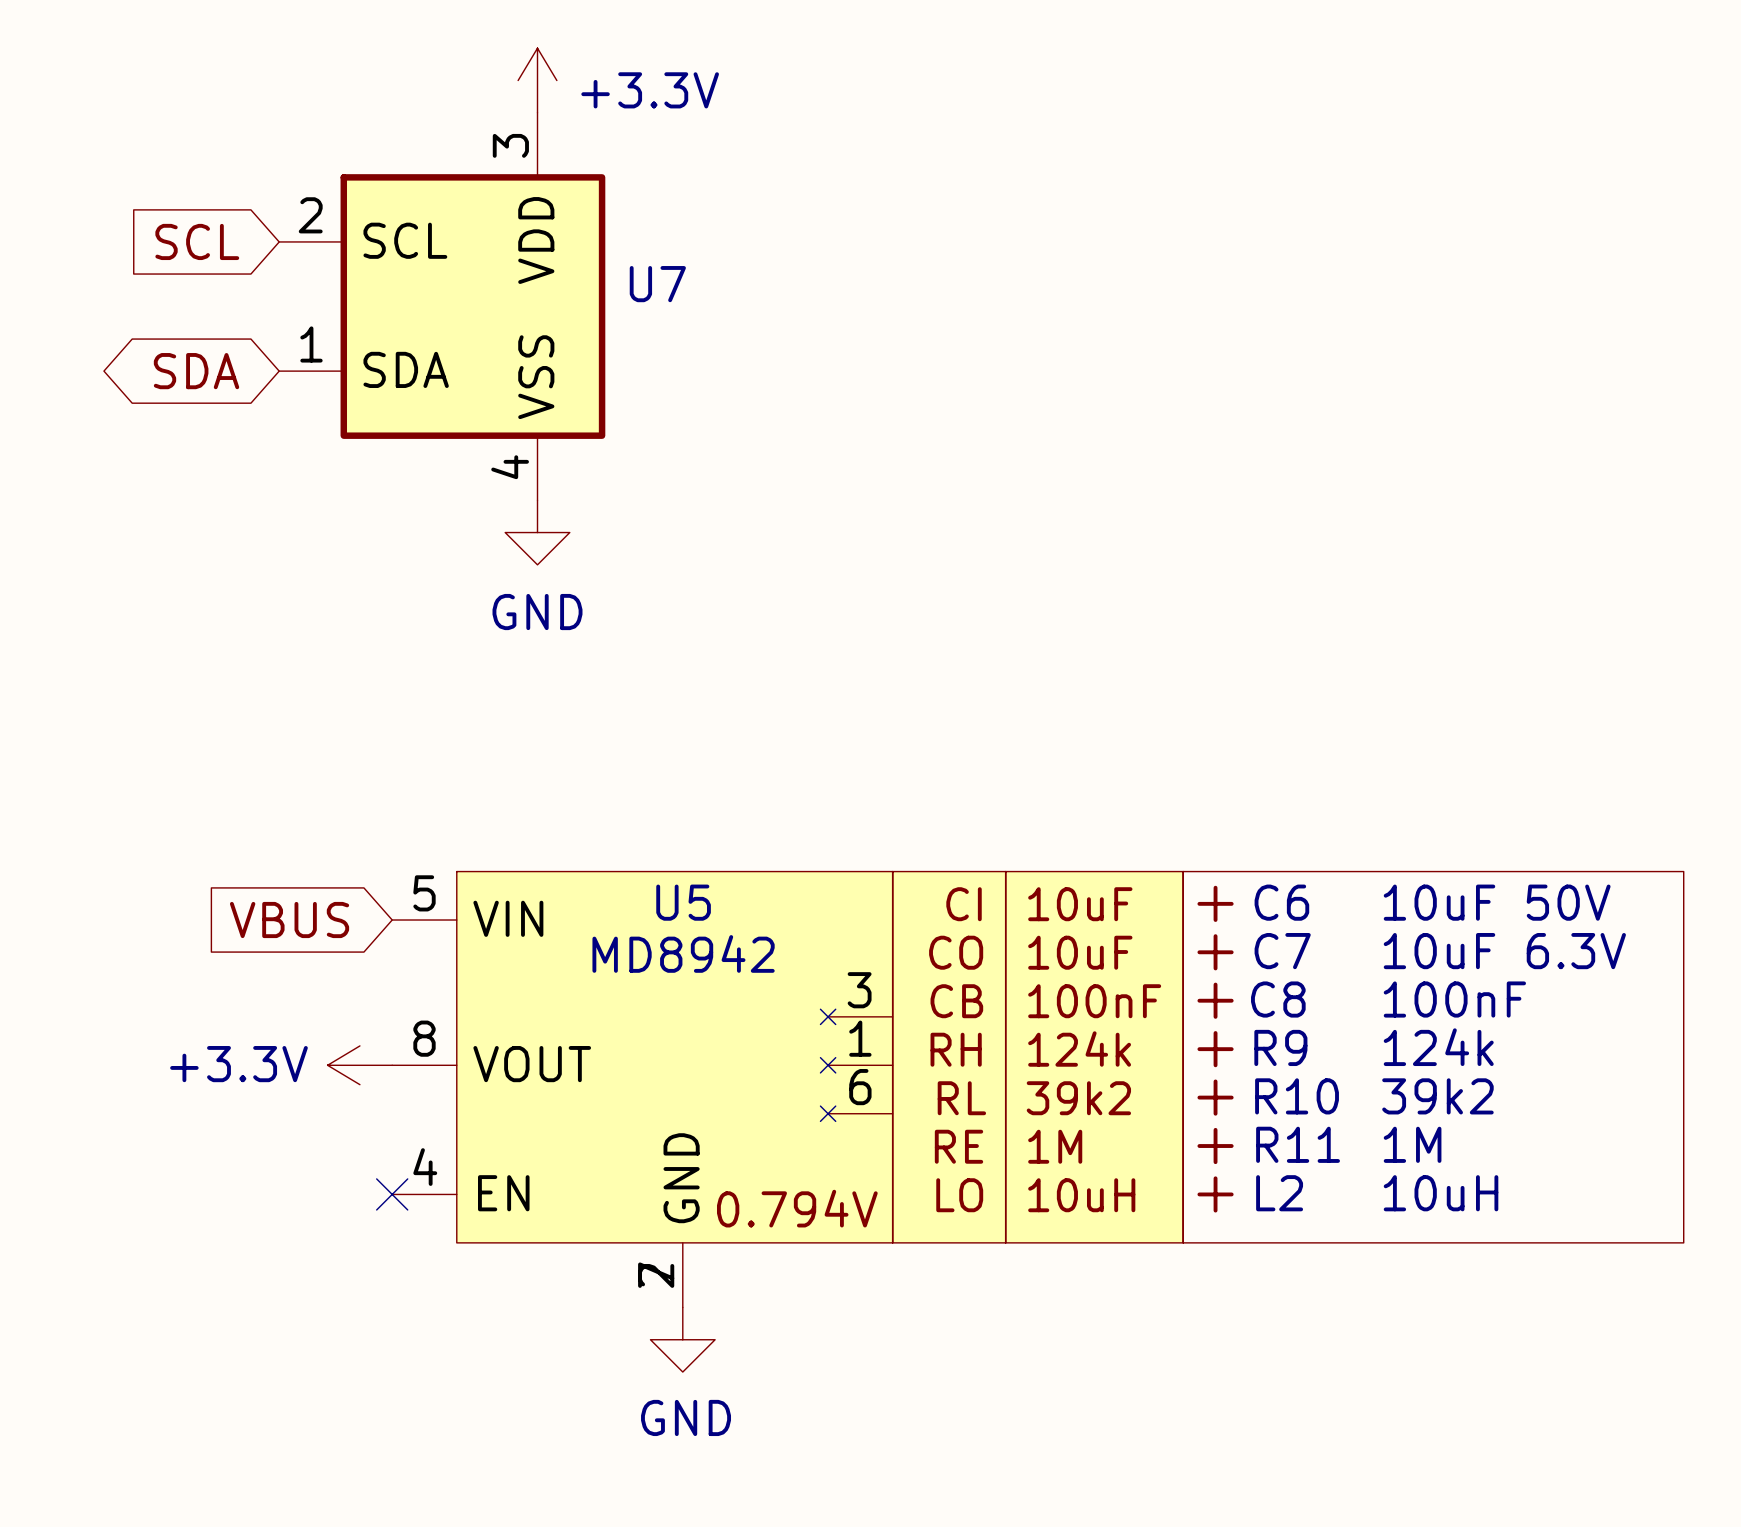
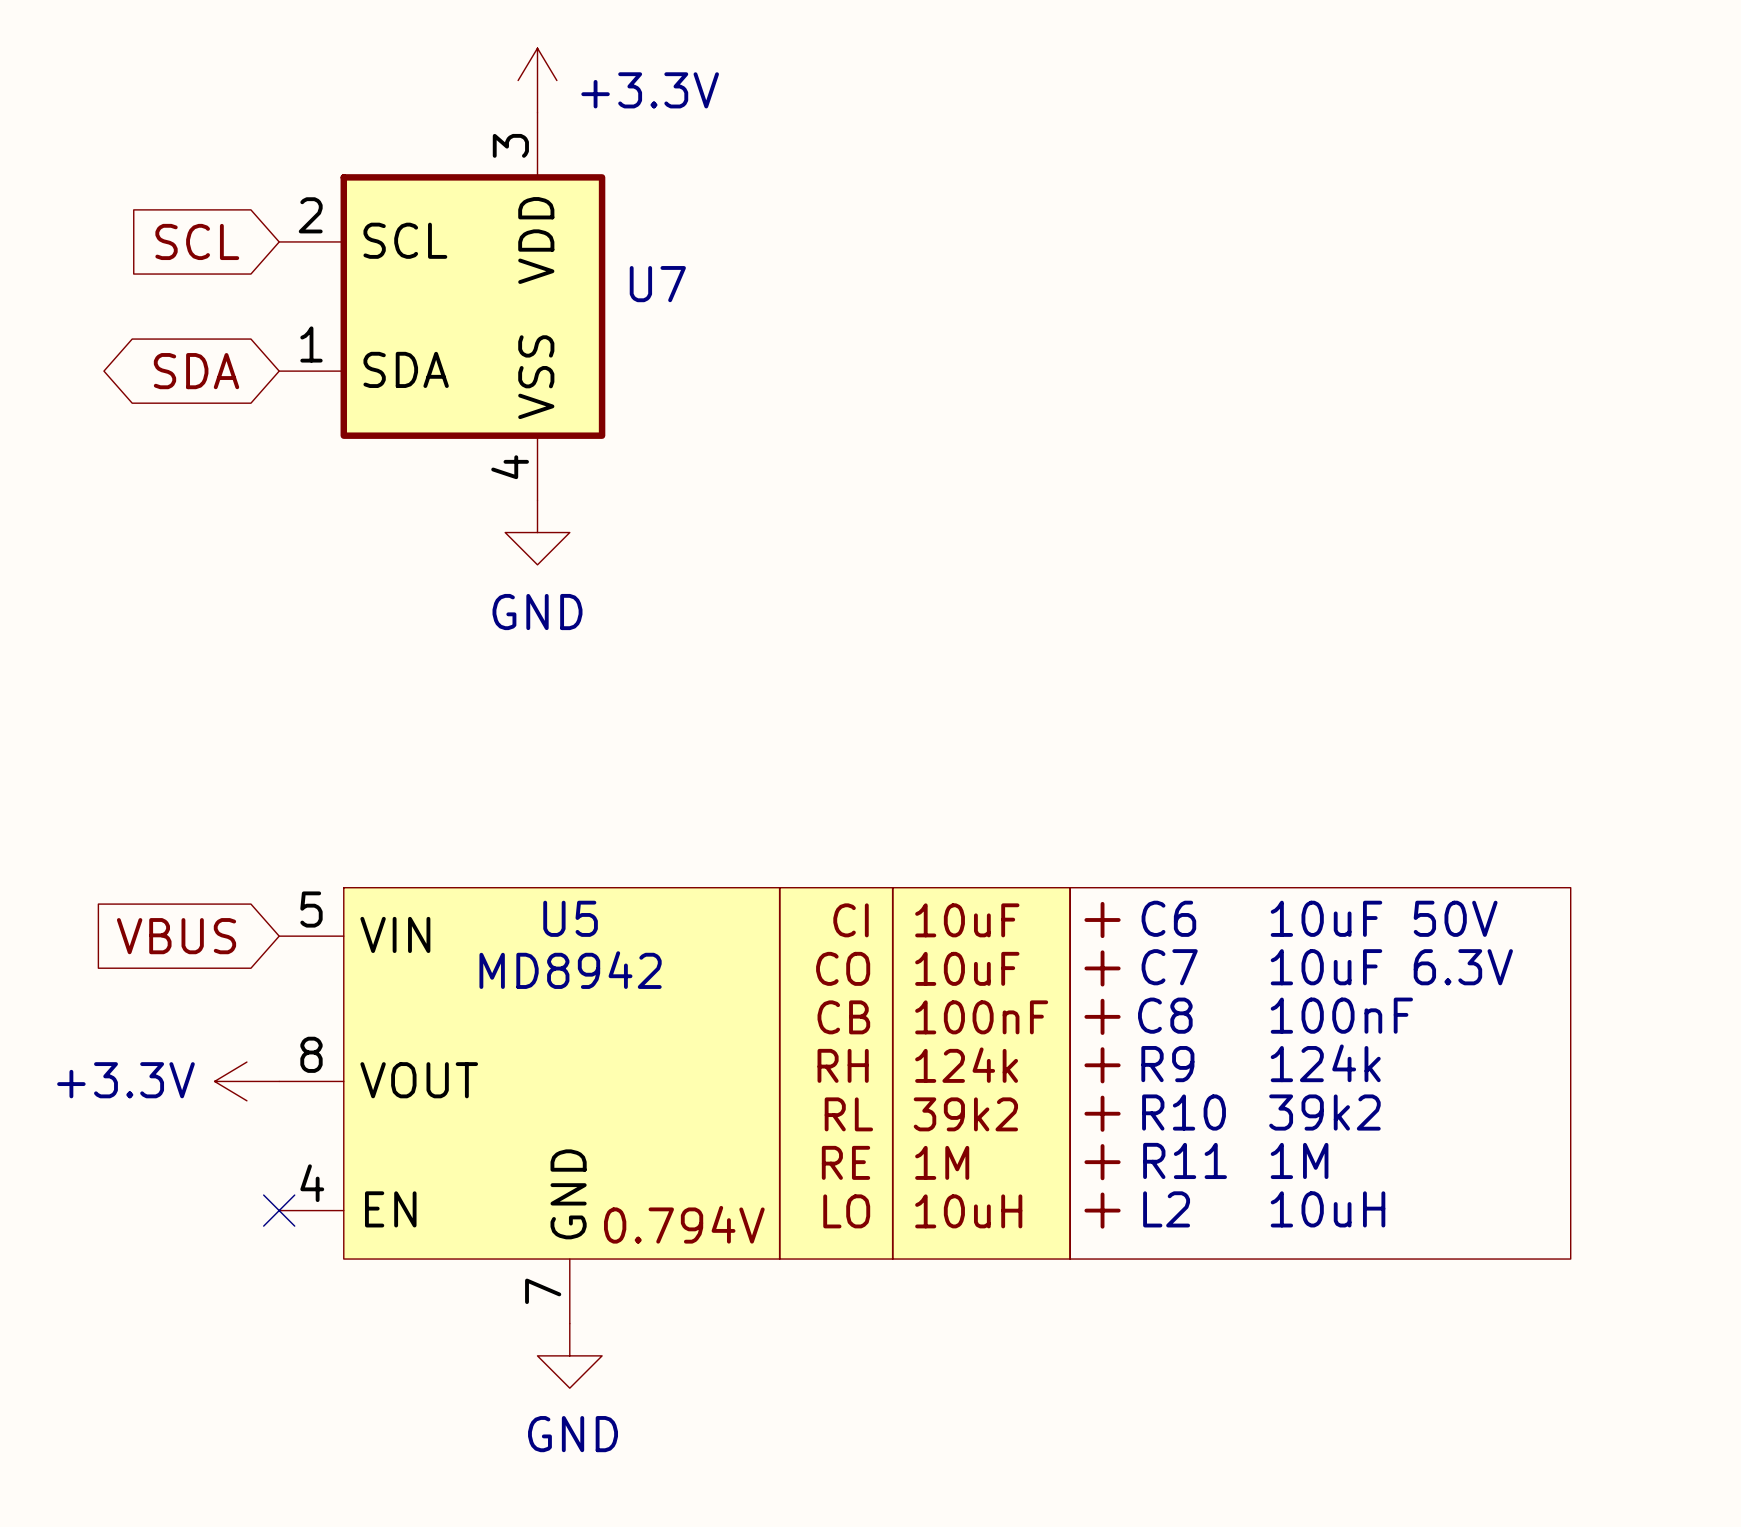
U5 symbol: [392, 871, 1684, 1308] -> [279, 887, 1571, 1324]
C6 position: (1215, 903) -> (1102, 920)
global label position: VBUS (289, 920) -> VBUS (176, 936)
C7 position: (1215, 952) -> (1102, 968)
C8 position: (1215, 1000) -> (1102, 1016)
R9 position: (1215, 1049) -> (1102, 1065)
power symbol position: +3.3V (359, 1065) -> +3.3V (246, 1081)
R10 position: (1215, 1097) -> (1102, 1113)
R11 position: (1215, 1146) -> (1102, 1162)
no-connect mark position: (392, 1194) -> (279, 1210)
L2 position: (1215, 1194) -> (1102, 1210)
power symbol position: GND (682, 1339) -> GND (569, 1355)

